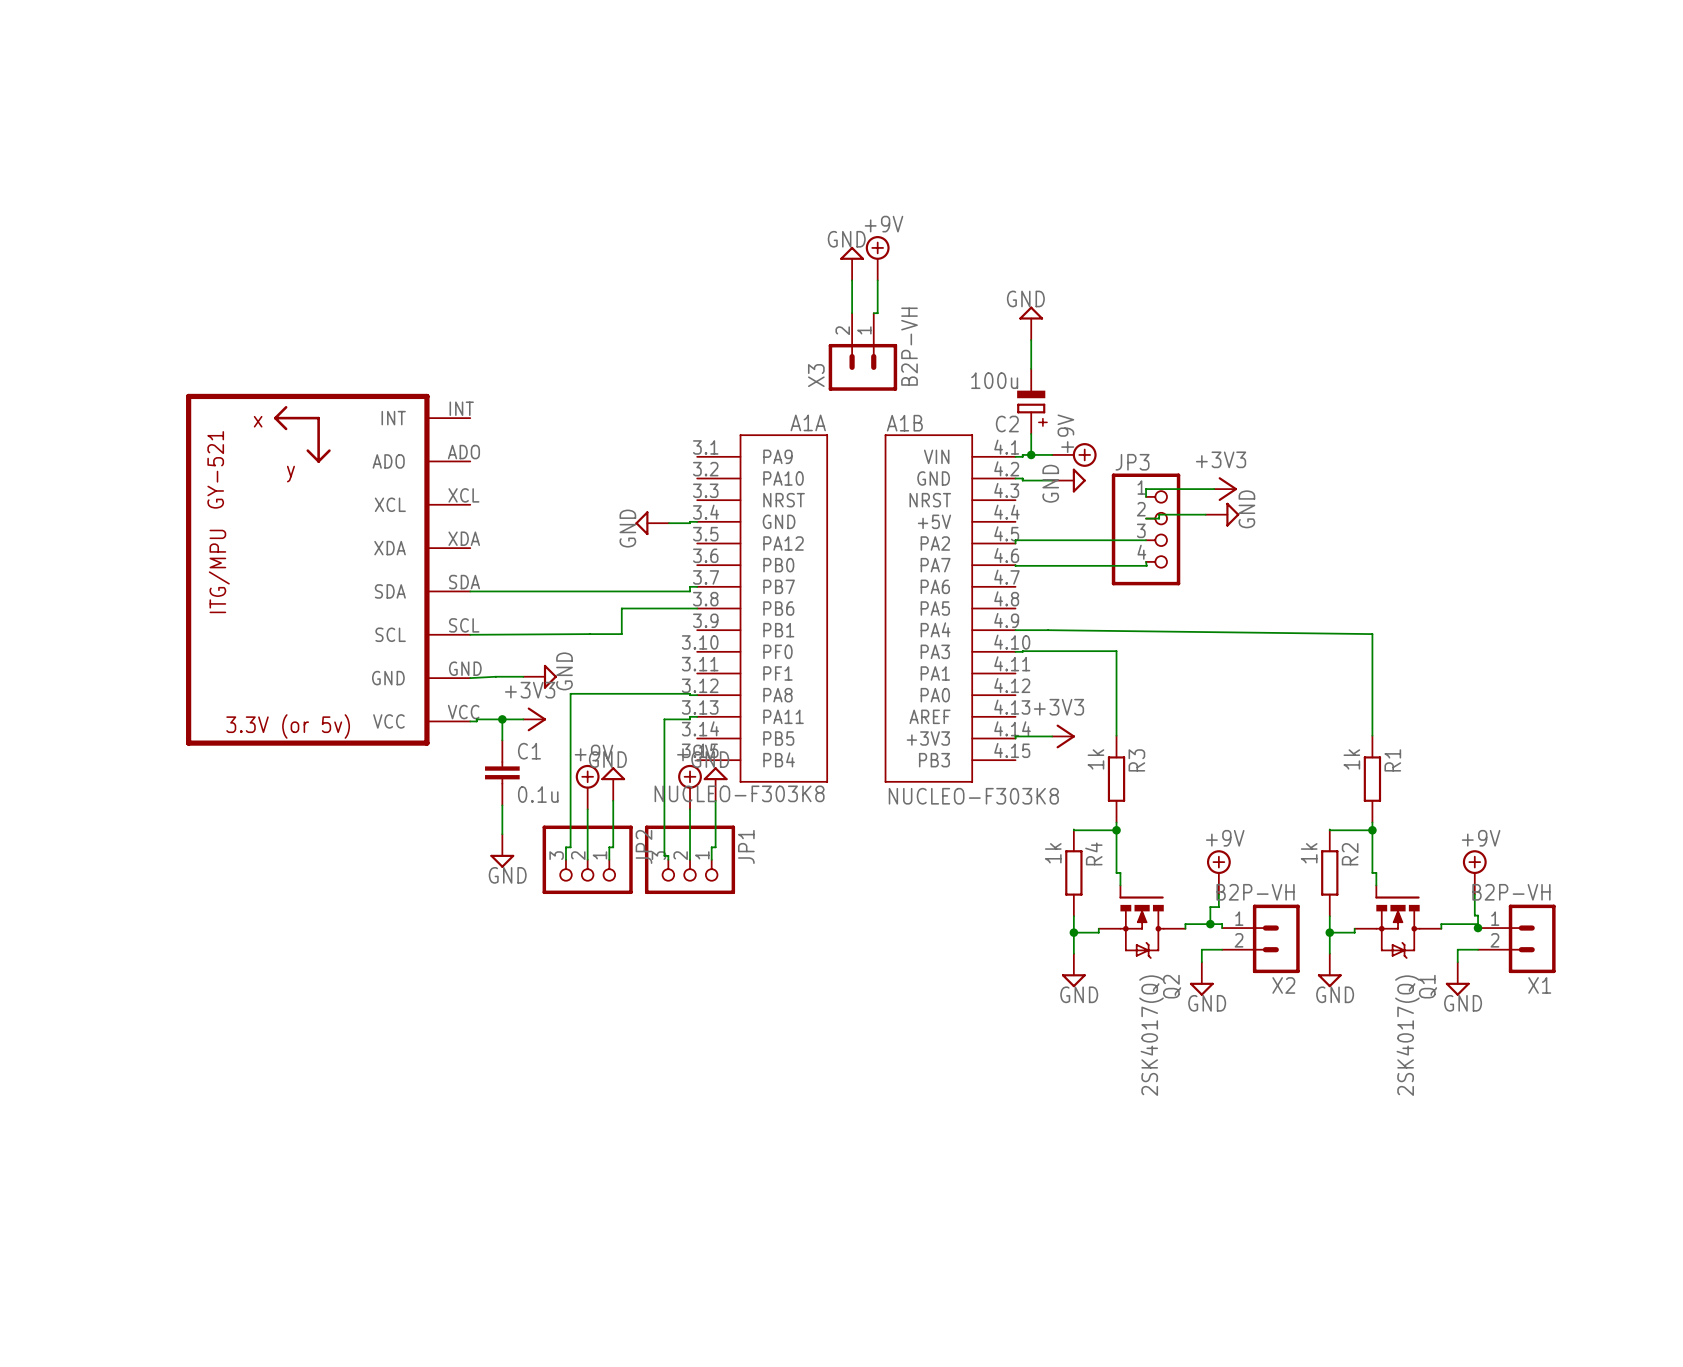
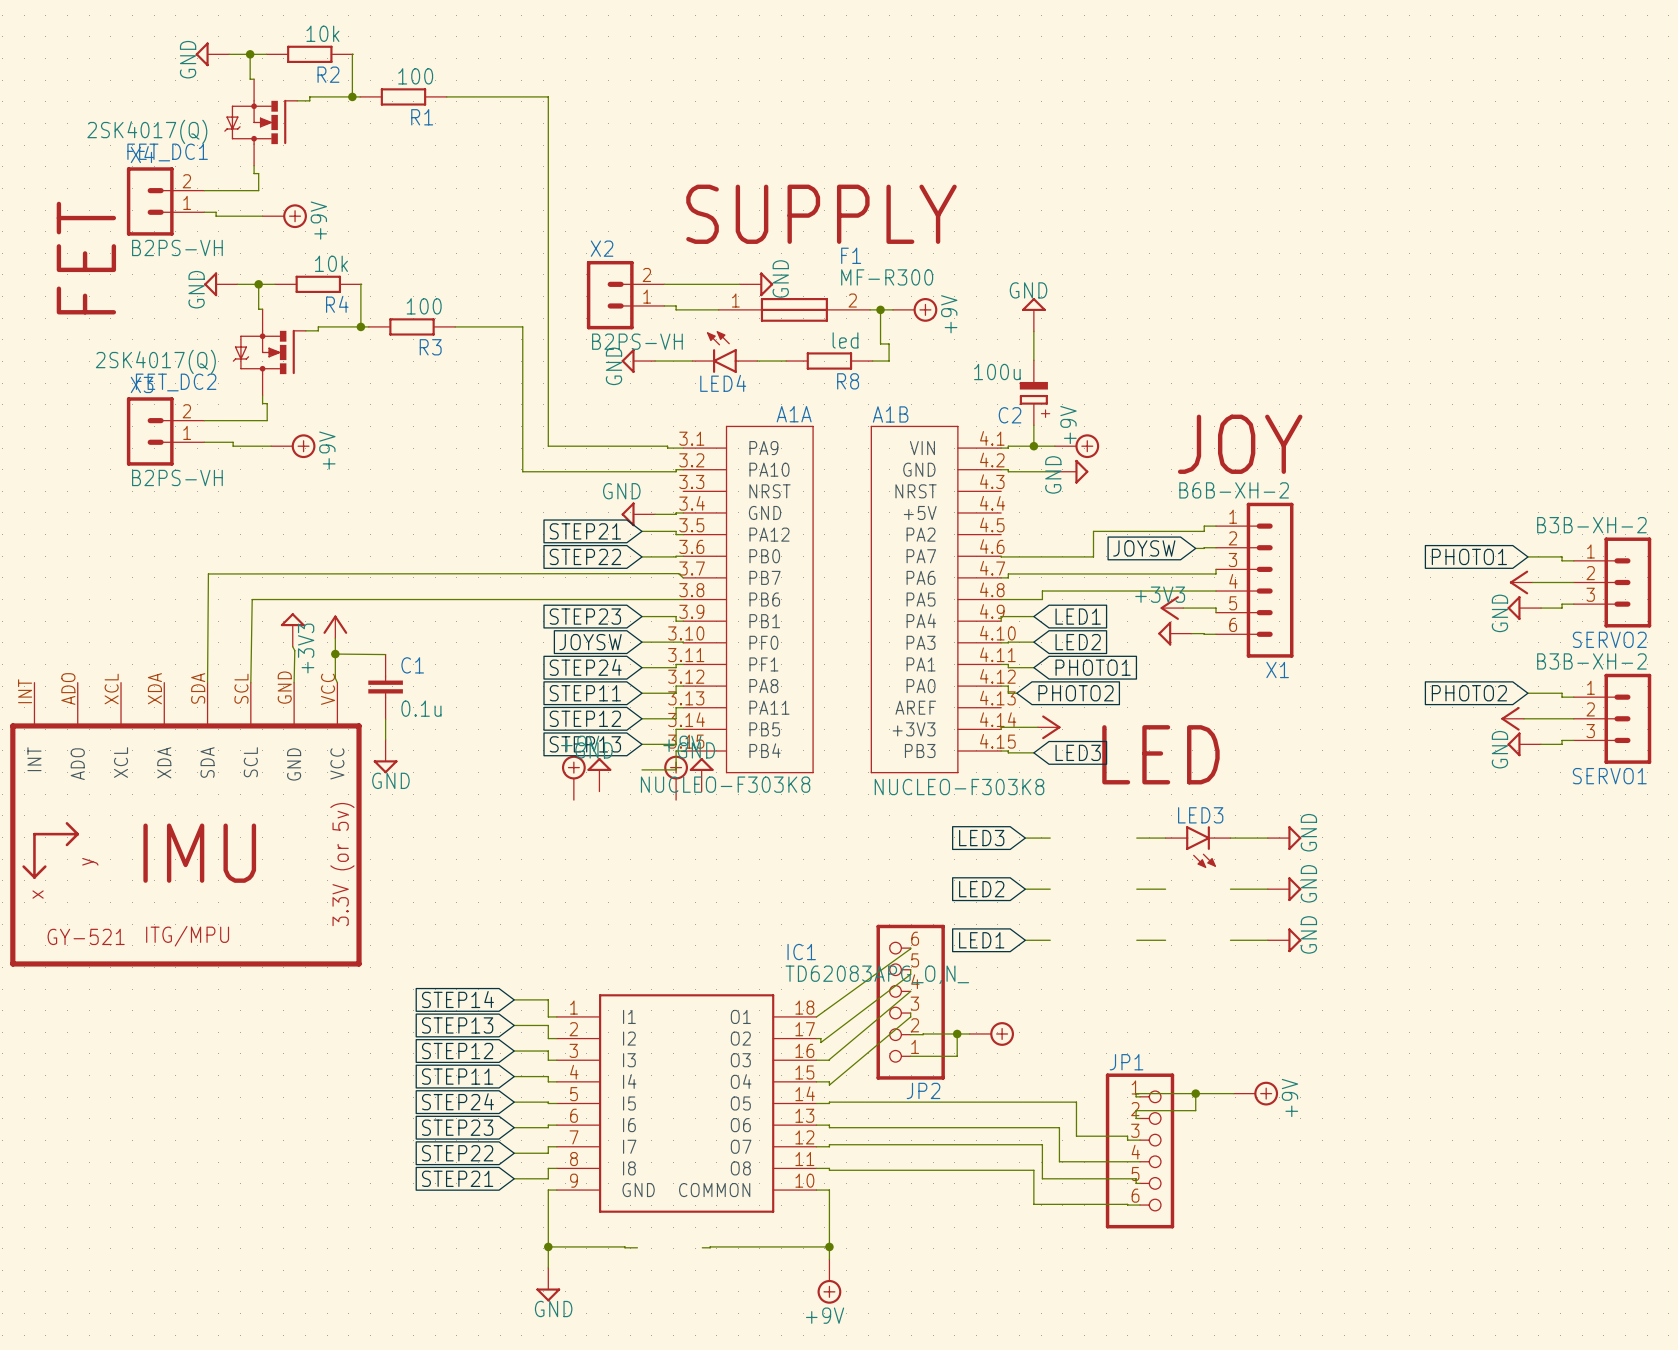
power symbol: none -> GND (212, 54)
wire: none -> (229, 54) (266, 54)
wire: none -> (250, 54) (250, 79) (254, 79)
junction: none -> (250, 54)
wire: none -> (353, 54) (352, 96)
junction: none -> (352, 96)
wire: none -> (360, 96) (309, 96) (309, 100) (297, 100)
wire: none -> (446, 96) (548, 96) (548, 446) (667, 446) (667, 448) (683, 448)
FET_DC1: none -> 2SK4017(Q) (261, 122)
wire: none -> (254, 165) (254, 173) (258, 173) (258, 190) (204, 190)
X4: none -> B2PS-VH (165, 201)
wire: none -> (204, 212) (216, 212) (216, 216) (262, 216)
text: none -> SUPPLY (821, 214)
power symbol: none -> +9V (284, 216)
power symbol rotation: 0° (877, 247) -> 90° clockwise (925, 309)
power symbol rotation: 0° (852, 253) -> 90° clockwise (766, 284)
power symbol position: +9V (877, 258) -> +9V (915, 309)
power symbol position: GND (852, 263) -> GND (756, 284)
text: none -> FET (86, 258)
wire: (852, 280) (852, 313) -> none
wire: (877, 280) (877, 313) (873, 313) -> none
power symbol: none -> GND (220, 284)
wire: none -> (237, 284) (275, 284)
wire: none -> (258, 284) (258, 309) (262, 309)
junction: none -> (258, 284)
wire: none -> (361, 284) (360, 326)
wire: none -> (664, 284) (739, 284)
wire: none -> (664, 305) (676, 305) (676, 309) (718, 309)
F1: none -> MF-R300 (794, 309)
wire: none -> (870, 309) (892, 309)
wire: none -> (880, 309) (880, 343) (889, 343) (889, 361) (872, 361)
junction: none -> (880, 309)
power symbol position: GND (1031, 323) -> GND (1033, 314)
junction: none -> (360, 326)
wire: none -> (368, 326) (318, 326) (318, 330) (305, 330)
wire: none -> (455, 326) (522, 326) (522, 471) (676, 471) (676, 469) (683, 469)
wire: (1031, 340) (1031, 368) -> (1033, 331) (1033, 360)
X3 value: B2P-VH (909, 346) -> B2PS-VH (177, 477)
X3 position: (862, 351) -> (165, 431)
LED4: none -> (724, 352)
FET_DC2: none -> 2SK4017(Q) (269, 352)
X3 rotation: 0° (862, 367) -> 90° clockwise (150, 431)
power symbol: none -> GND (638, 361)
wire: none -> (655, 361) (692, 361)
wire: none -> (757, 361) (786, 361)
R8: none -> led (829, 361)
C2 position: (1031, 401) -> (1033, 392)
wire: none -> (262, 395) (262, 403) (267, 403) (267, 420) (204, 420)
wire: (1031, 433) (1031, 454) -> (1033, 425) (1033, 446)
wire: none -> (204, 442) (233, 442) (233, 446) (271, 446)
text: none -> JOY (1240, 444)
power symbol: none -> +9V (293, 446)
junction position: (1031, 454) -> (1033, 446)
power symbol position: +9V (1074, 454) -> +9V (1077, 446)
power symbol text position: +3V3 (1221, 459) -> +3V3 (1160, 594)
power symbol position: GND (1068, 480) -> GND (1071, 471)
wire: (1214, 489) (1146, 489) (1146, 496) -> none
power symbol position: +3V3 (1225, 489) -> +3V3 (1171, 608)
power symbol rotation: 0° (1227, 489) -> 180° (1169, 608)
wire: (1205, 514) (1159, 514) (1159, 518) (1146, 518) -> none
power symbol: GND (1222, 514) -> none
power symbol text rotation: 0° (627, 528) -> 90° clockwise (621, 491)
JP3: (1146, 529) -> none
wire: none -> (1216, 526) (1204, 526) (1204, 531) (1131, 531)
global label: none -> STEP21 (585, 531)
wire: none -> (642, 531) (676, 531) (676, 534) (683, 534)
wire: (1107, 540) (1015, 540) (1015, 543) -> none
wire: none -> (1216, 547) (1195, 548)
global label: none -> JOYSW (1144, 548)
wire: (1146, 561) (1146, 565) (1107, 565) -> (1093, 531) (1093, 556)
global label: none -> STEP22 (585, 556)
wire: none -> (683, 556) (642, 556)
global label: none -> PHOTO1 (1469, 556)
wire: none -> (1527, 556) (1562, 556) (1562, 560) (1573, 560)
part: (328, 569) -> none
wire: none -> (1216, 569) (1216, 573) (1008, 573) (1008, 577) (1001, 577)
wire: (697, 586) (690, 586) (690, 591) (470, 591) -> (683, 577) (678, 573) (208, 573) (207, 682)
power symbol: none -> (1521, 582)
wire: none -> (1532, 582) (1573, 582)
SERVO2: none -> B3B-XH-2 (1612, 582)
wire: none -> (1216, 591) (1042, 591) (1042, 599) (1001, 599)
wire: (621, 608) (621, 634) (470, 634) -> (607, 599) (252, 599) (250, 682)
wire: none -> (1573, 604) (1562, 604) (1562, 608) (1541, 608)
wire: none -> (1183, 608) (1216, 608) (1216, 612)
power symbol: none -> GND (1524, 608)
global label: none -> STEP23 (585, 616)
wire: none -> (642, 616) (676, 616) (676, 621) (683, 621)
global label: none -> LED1 (1078, 616)
wire: (1015, 630) (1372, 634) (1372, 735) -> (1001, 621) (1001, 616) (1033, 616)
power symbol: none -> (292, 629)
power symbol: none -> (1175, 633)
wire: none -> (1191, 633) (1216, 634)
wire: none -> (335, 638) (335, 678) (337, 682)
global label: none -> JOYSW (590, 642)
wire: none -> (642, 642) (683, 642)
wire: (1048, 651) (1116, 651) (1116, 735) -> none
global label: none -> LED2 (1078, 642)
wire: none -> (292, 646) (294, 650) (294, 682)
wire: none -> (335, 654) (385, 654)
junction: none -> (335, 654)
wire: none -> (683, 664) (676, 664) (676, 667) (642, 667)
wire: none -> (1001, 664) (1008, 664) (1008, 667) (1033, 667)
wire: (523, 676) (470, 678) -> none
power symbol: GND (540, 676) -> none
global label: none -> STEP24 (585, 667)
global label: none -> PHOTO1 (1093, 667)
wire: (690, 695) (570, 693) (570, 847) (565, 847) (565, 859) -> (676, 686) (676, 693) (642, 693)
wire: none -> (1001, 686) (1008, 686) (1008, 693) (1016, 693)
global label: none -> STEP11 (585, 693)
global label: none -> PHOTO2 (1076, 693)
global label: none -> PHOTO2 (1469, 693)
wire: none -> (1527, 693) (1562, 693) (1562, 697) (1573, 697)
power symbol text: +3V3 (1058, 707) -> none
wire: (502, 719) (502, 740) -> none
junction: (502, 719) -> none
wire: (523, 719) (476, 719) (476, 721) (470, 721) -> none
power symbol position: +3V3 (534, 719) -> +3V3 (335, 626)
power symbol rotation: 0° (536, 719) -> 90° counterclockwise (335, 624)
wire: (690, 719) (664, 719) (664, 855) (668, 855) (668, 859) -> (676, 710) (676, 718) (642, 718)
global label: none -> STEP12 (585, 718)
power symbol: none -> (1512, 718)
wire: none -> (1524, 718) (1573, 718)
SERVO1: none -> B3B-XH-2 (1612, 718)
wire: none -> (385, 719) (385, 739)
wire: none -> (683, 729) (676, 729) (676, 744) (642, 744)
wire: none -> (1573, 740) (1562, 740) (1562, 744) (1541, 744)
global label: none -> STEP13 (585, 744)
power symbol: none -> GND (1524, 744)
R3 value: 1k (1095, 759) -> 100 (424, 306)
R1 value: 1k (1351, 759) -> 100 (415, 76)
wire: none -> (683, 750) (676, 750) (676, 769) (642, 769)
wire: none -> (1001, 750) (1033, 752)
global label: none -> LED3 (1078, 752)
text: none -> LED (1160, 754)
power symbol: none -> GND (385, 756)
C1 position: (502, 772) -> (385, 687)
R3 rotation: 0° (1116, 779) -> 90° clockwise (412, 326)
R3 position: (1116, 779) -> (412, 326)
R1 rotation: 0° (1372, 779) -> 90° clockwise (403, 96)
R1 position: (1372, 779) -> (403, 96)
wire: (613, 800) (613, 847) (609, 847) (609, 859) -> none
wire: (715, 800) (715, 847) (711, 847) (711, 859) -> none
wire: (502, 805) (502, 834) -> none
wire: (587, 809) (587, 859) -> none
wire: (690, 809) (690, 859) -> none
wire: (1116, 822) (1116, 872) (1120, 872) (1120, 885) -> none
wire: (1372, 822) (1372, 872) (1376, 872) (1376, 885) -> none
JP2 symbol: [542, 825, 633, 895] -> [876, 924, 945, 1080]
JP1 symbol: [644, 825, 736, 895] -> [1105, 1073, 1175, 1229]
wire: (1073, 829) (1116, 830) -> none
wire: (1329, 829) (1372, 830) -> none
junction: (1116, 830) -> none
junction: (1372, 830) -> none
part: none -> (185, 824)
JP2 name position: JP2 (643, 846) -> JP2 (923, 1090)
JP1 name position: JP1 (746, 846) -> JP1 (1126, 1062)
global label: none -> LED3 (981, 838)
wire: none -> (1025, 838) (1050, 838)
wire: none -> (1136, 838) (1165, 838)
wire: none -> (1230, 838) (1267, 838)
power symbol: none -> GND (1284, 838)
power symbol: GND (502, 851) -> none
R4 value: 1k (1053, 853) -> 10k (331, 263)
R2 value: 1k (1309, 853) -> 10k (322, 33)
LED3: none -> (1198, 847)
text: none -> IMU (199, 853)
R4 rotation: 0° (1073, 872) -> 90° clockwise (318, 284)
R4 position: (1073, 872) -> (318, 284)
power symbol: +9V (1218, 872) -> none
R2 rotation: 0° (1329, 872) -> 90° clockwise (309, 54)
R2 position: (1329, 872) -> (309, 54)
power symbol: +9V (1474, 872) -> none
X2 value: B2P-VH (1255, 892) -> B2PS-VH (637, 341)
X1 value: B2P-VH (1511, 892) -> B6B-XH-2 (1234, 490)
wire: (1218, 894) (1218, 907) (1210, 907) (1210, 924) -> none
wire: (1474, 894) (1474, 915) (1478, 915) (1478, 928) -> none
global label: none -> LED2 (981, 889)
wire: none -> (1025, 889) (1050, 889)
wire: none -> (1136, 889) (1165, 889)
wire: none -> (1230, 889) (1267, 889)
power symbol: none -> GND (1284, 889)
X1 symbol: [1478, 904, 1556, 974] -> [1216, 502, 1294, 658]
wire: (1073, 916) (1073, 953) -> none
wire: (1329, 916) (1329, 953) -> none
Q2: 2SK4017(Q) (1142, 921) -> none
Q1: 2SK4017(Q) (1398, 921) -> none
junction: (1210, 924) -> none
wire: (1478, 924) (1441, 924) (1441, 928) -> none
wire: (1098, 928) (1098, 932) (1073, 932) -> none
wire: (1222, 928) (1222, 924) (1185, 924) (1185, 928) -> none
wire: (1354, 928) (1354, 932) (1329, 932) -> none
junction: (1478, 928) -> none
junction: (1073, 932) -> none
junction: (1329, 932) -> none
X2 position: (1260, 938) -> (625, 295)
X2 rotation: 0° (1276, 938) -> 180° (610, 295)
global label: none -> LED1 (981, 940)
wire: none -> (1025, 940) (1050, 940)
wire: none -> (1136, 940) (1165, 940)
wire: (1222, 949) (1201, 949) (1201, 962) -> none
wire: (1478, 949) (1457, 949) (1457, 962) -> none
wire: none -> (910, 948) (816, 1016)
power symbol: GND (1073, 970) -> none
power symbol position: GND (1329, 970) -> GND (1284, 940)
power symbol: GND (1201, 978) -> none
power symbol: GND (1457, 978) -> none
wire: none -> (910, 969) (910, 974) (820, 1042) (820, 1038) (816, 1038)
power symbol rotation: 0° (1329, 980) -> 90° counterclockwise (1294, 940)
X1 name position: X1 (1539, 985) -> X1 (1277, 669)
wire: none -> (910, 991) (829, 1060) (816, 1060)
global label: none -> STEP14 (457, 999)
wire: none -> (514, 999) (548, 999) (548, 1016) (556, 1016)
wire: none -> (910, 1013) (910, 1016) (829, 1085) (829, 1081) (816, 1081)
global label: none -> STEP13 (457, 1025)
wire: none -> (514, 1025) (548, 1025) (548, 1038) (556, 1038)
wire: none -> (957, 1033) (957, 1056) (910, 1056)
junction: none -> (957, 1033)
wire: none -> (969, 1033) (910, 1034)
power symbol: none -> (991, 1033)
global label: none -> STEP12 (457, 1051)
wire: none -> (514, 1051) (548, 1051) (548, 1060) (556, 1060)
global label: none -> STEP11 (457, 1076)
wire: none -> (514, 1076) (548, 1076) (548, 1081) (556, 1081)
wire: none -> (1195, 1093) (1195, 1110) (1136, 1110) (1136, 1118) (1140, 1118)
junction: none -> (1195, 1093)
wire: none -> (1233, 1093) (1136, 1093) (1136, 1096) (1140, 1096)
power symbol: none -> +9V (1255, 1093)
global label: none -> STEP24 (457, 1101)
wire: none -> (514, 1102) (556, 1103)
IC1: none -> TD62083APG_O,N_ (686, 1103)
wire: none -> (816, 1103) (1076, 1102) (1076, 1136) (1127, 1136) (1127, 1140) (1140, 1140)
wire: none -> (556, 1125) (548, 1125) (548, 1127) (514, 1127)
wire: none -> (816, 1125) (829, 1125) (829, 1127) (1059, 1127) (1059, 1161) (1140, 1161)
global label: none -> STEP23 (457, 1127)
wire: none -> (556, 1146) (548, 1146) (548, 1153) (514, 1153)
wire: none -> (816, 1146) (829, 1146) (829, 1144) (1042, 1144) (1042, 1178) (1136, 1178) (1136, 1183) (1140, 1183)
global label: none -> STEP22 (457, 1153)
wire: none -> (556, 1168) (548, 1168) (548, 1178) (514, 1178)
wire: none -> (816, 1168) (829, 1168) (829, 1170) (1033, 1170) (1033, 1204) (1140, 1205)
global label: none -> STEP21 (457, 1178)
wire: none -> (556, 1190) (548, 1190) (548, 1267)
wire: none -> (816, 1190) (829, 1190) (829, 1259)
wire: none -> (548, 1246) (637, 1247)
junction: none -> (548, 1246)
wire: none -> (829, 1246) (702, 1247)
junction: none -> (829, 1246)
power symbol: none -> +9V (829, 1281)
power symbol: none -> GND (548, 1284)

